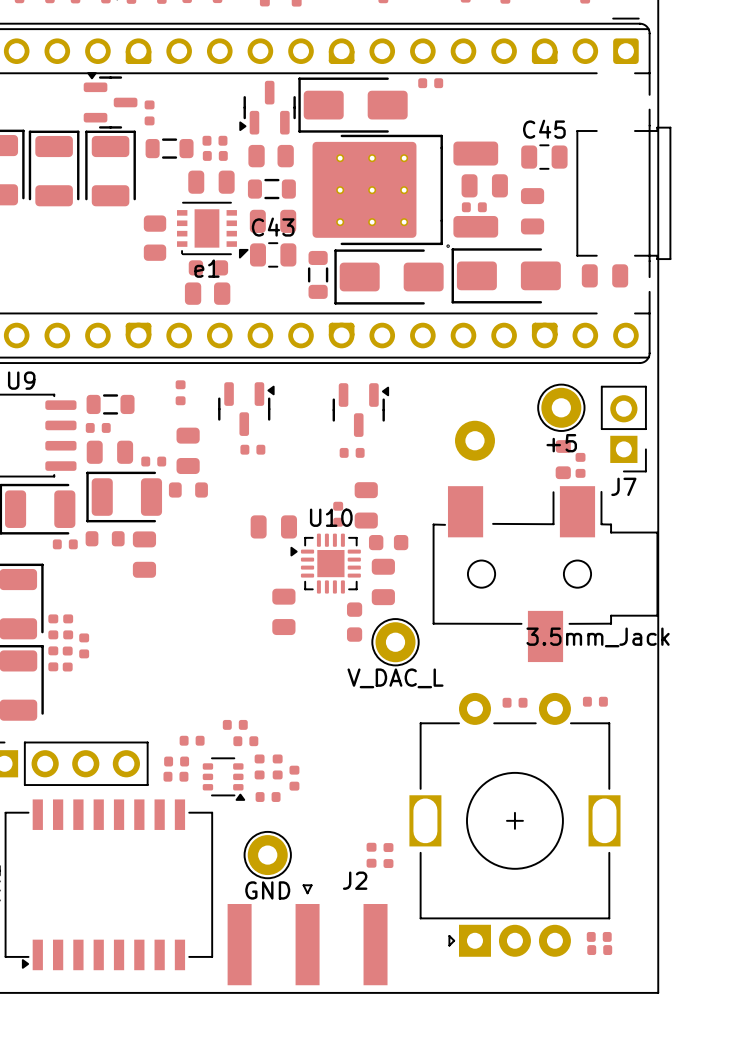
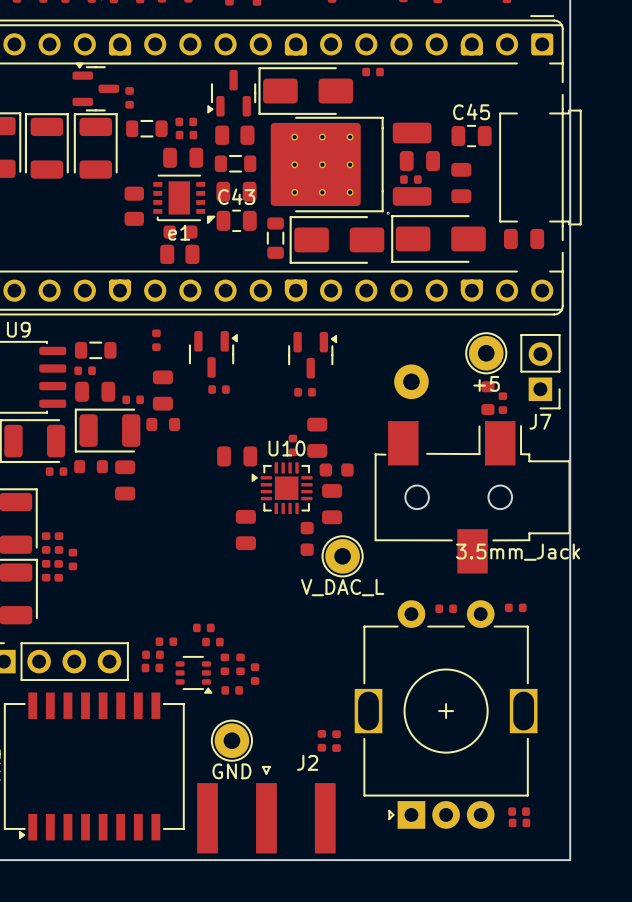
part: none -> (152, 654)
part: (176, 761) -> none
part: none -> (152, 667)
part: (175, 776) -> none

